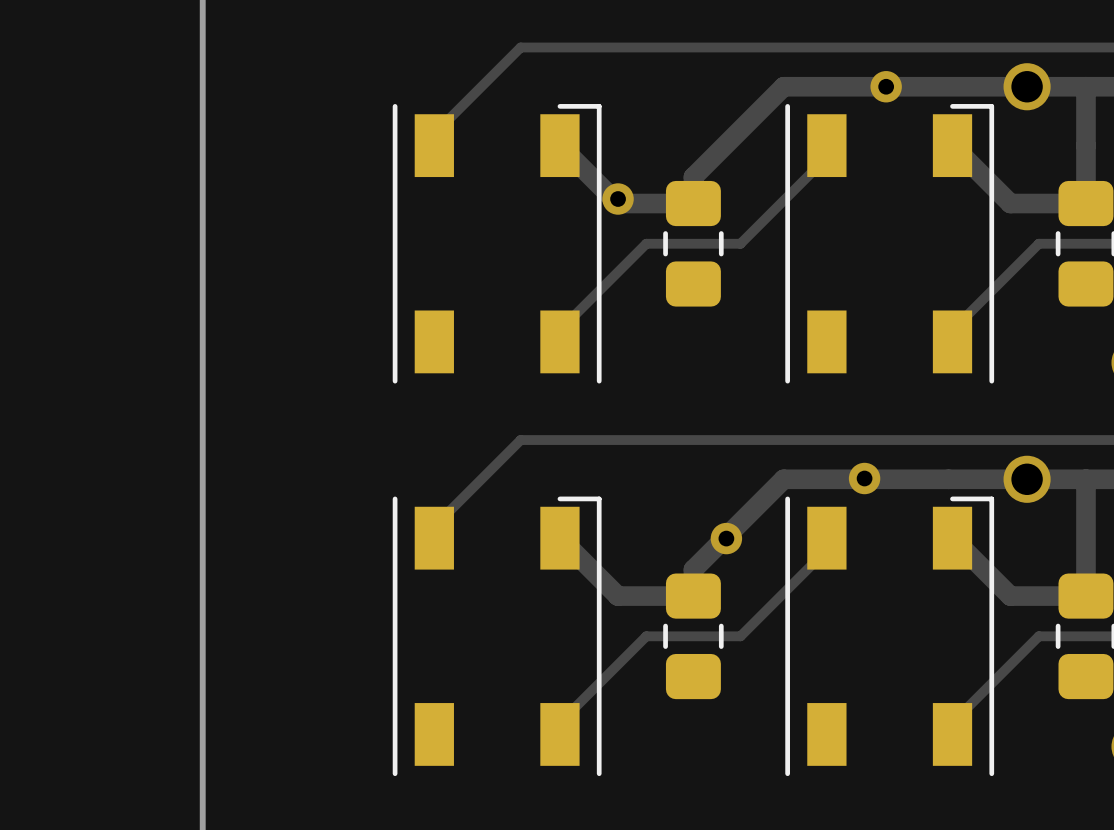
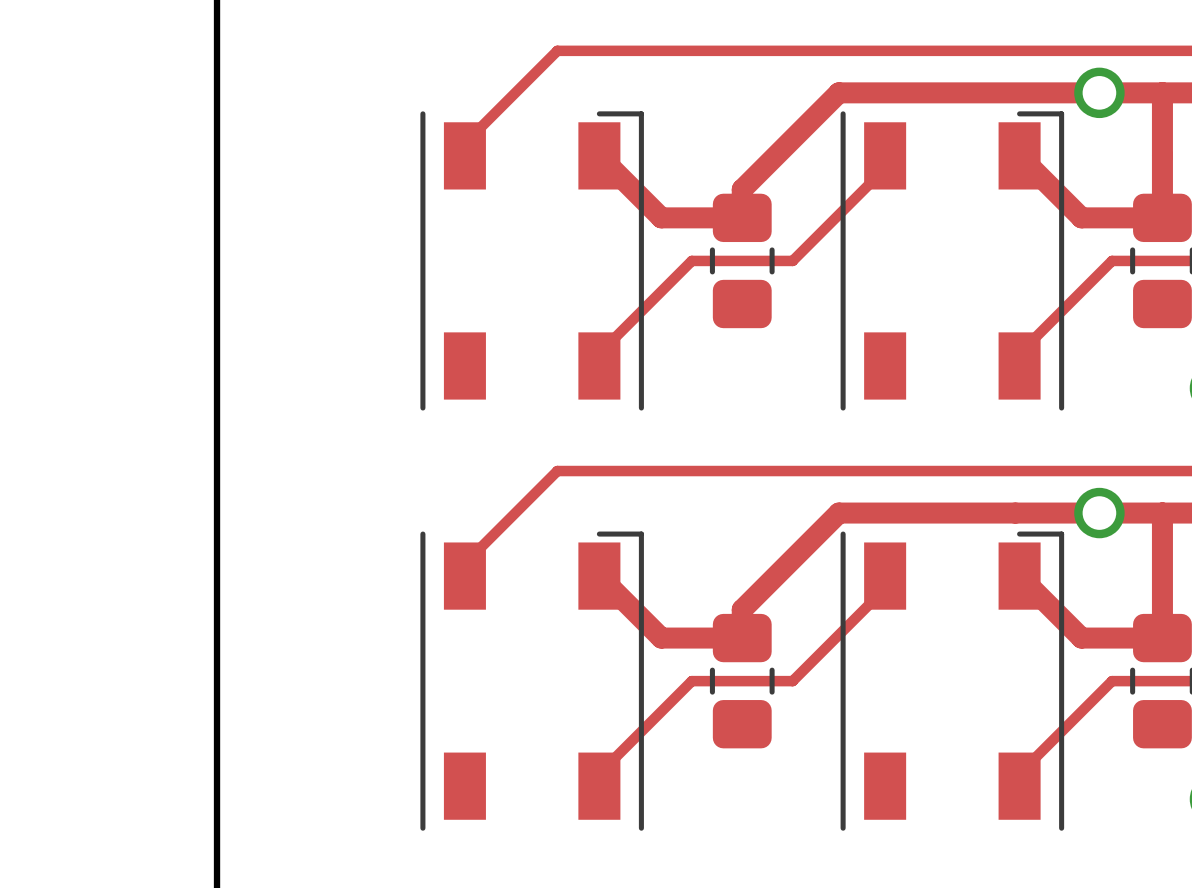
via: (886, 86) -> none
via: (618, 199) -> none
via: (864, 478) -> none
via: (726, 538) -> none

